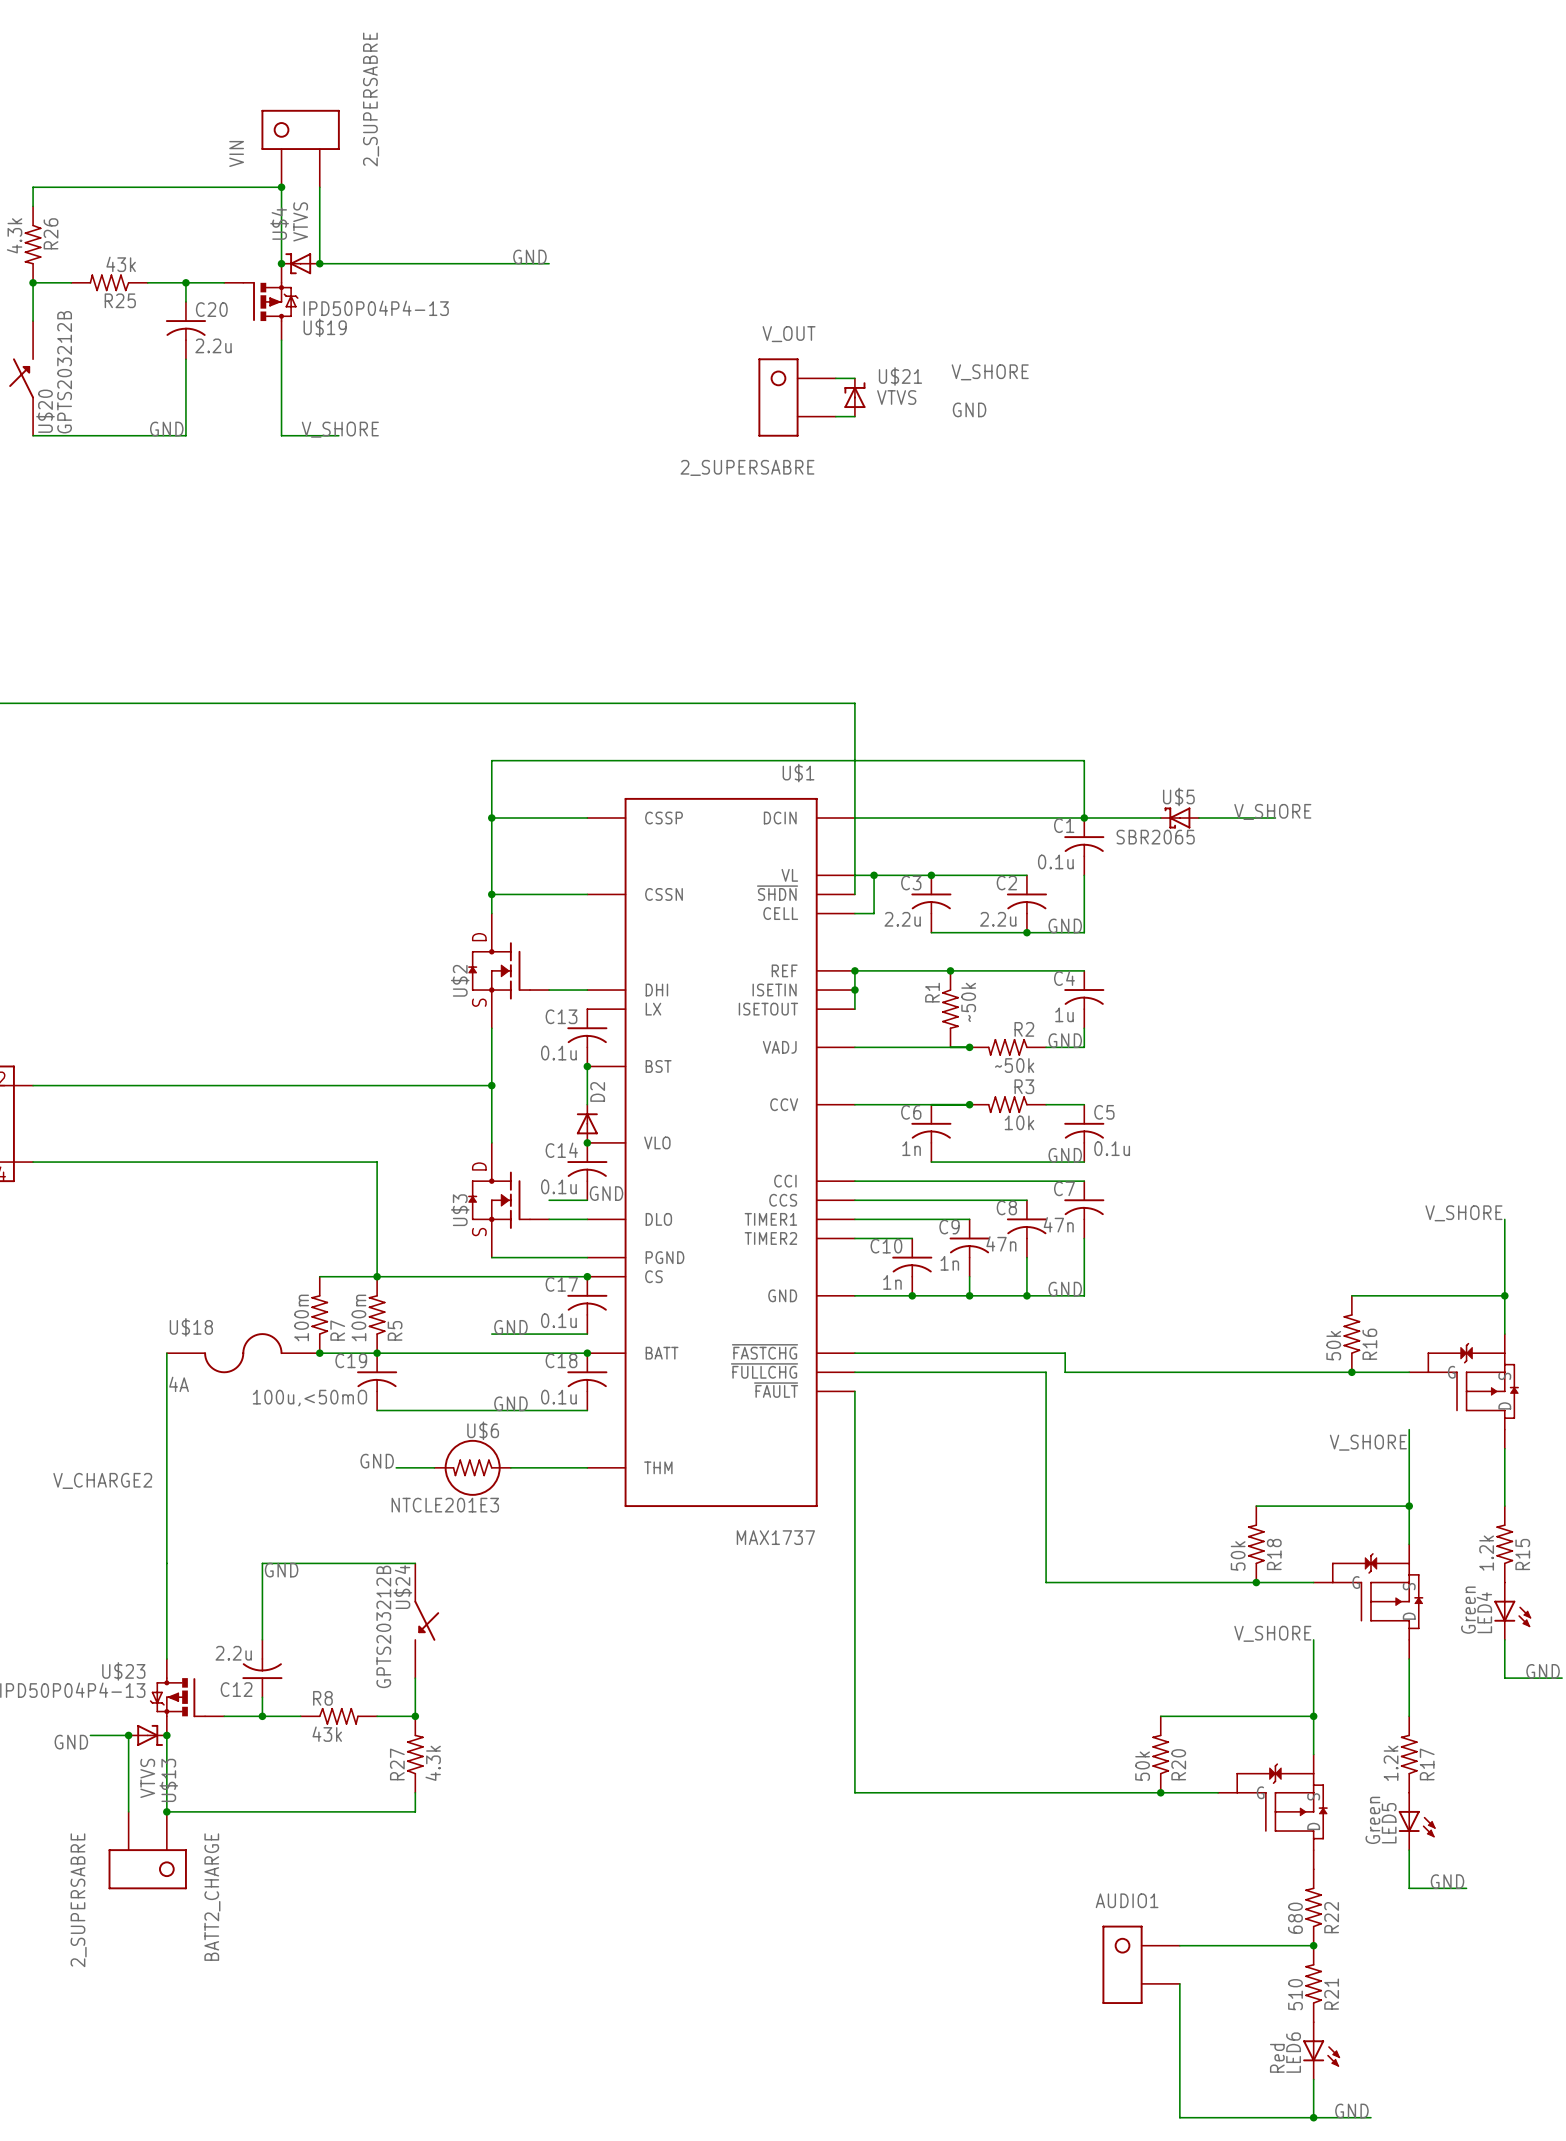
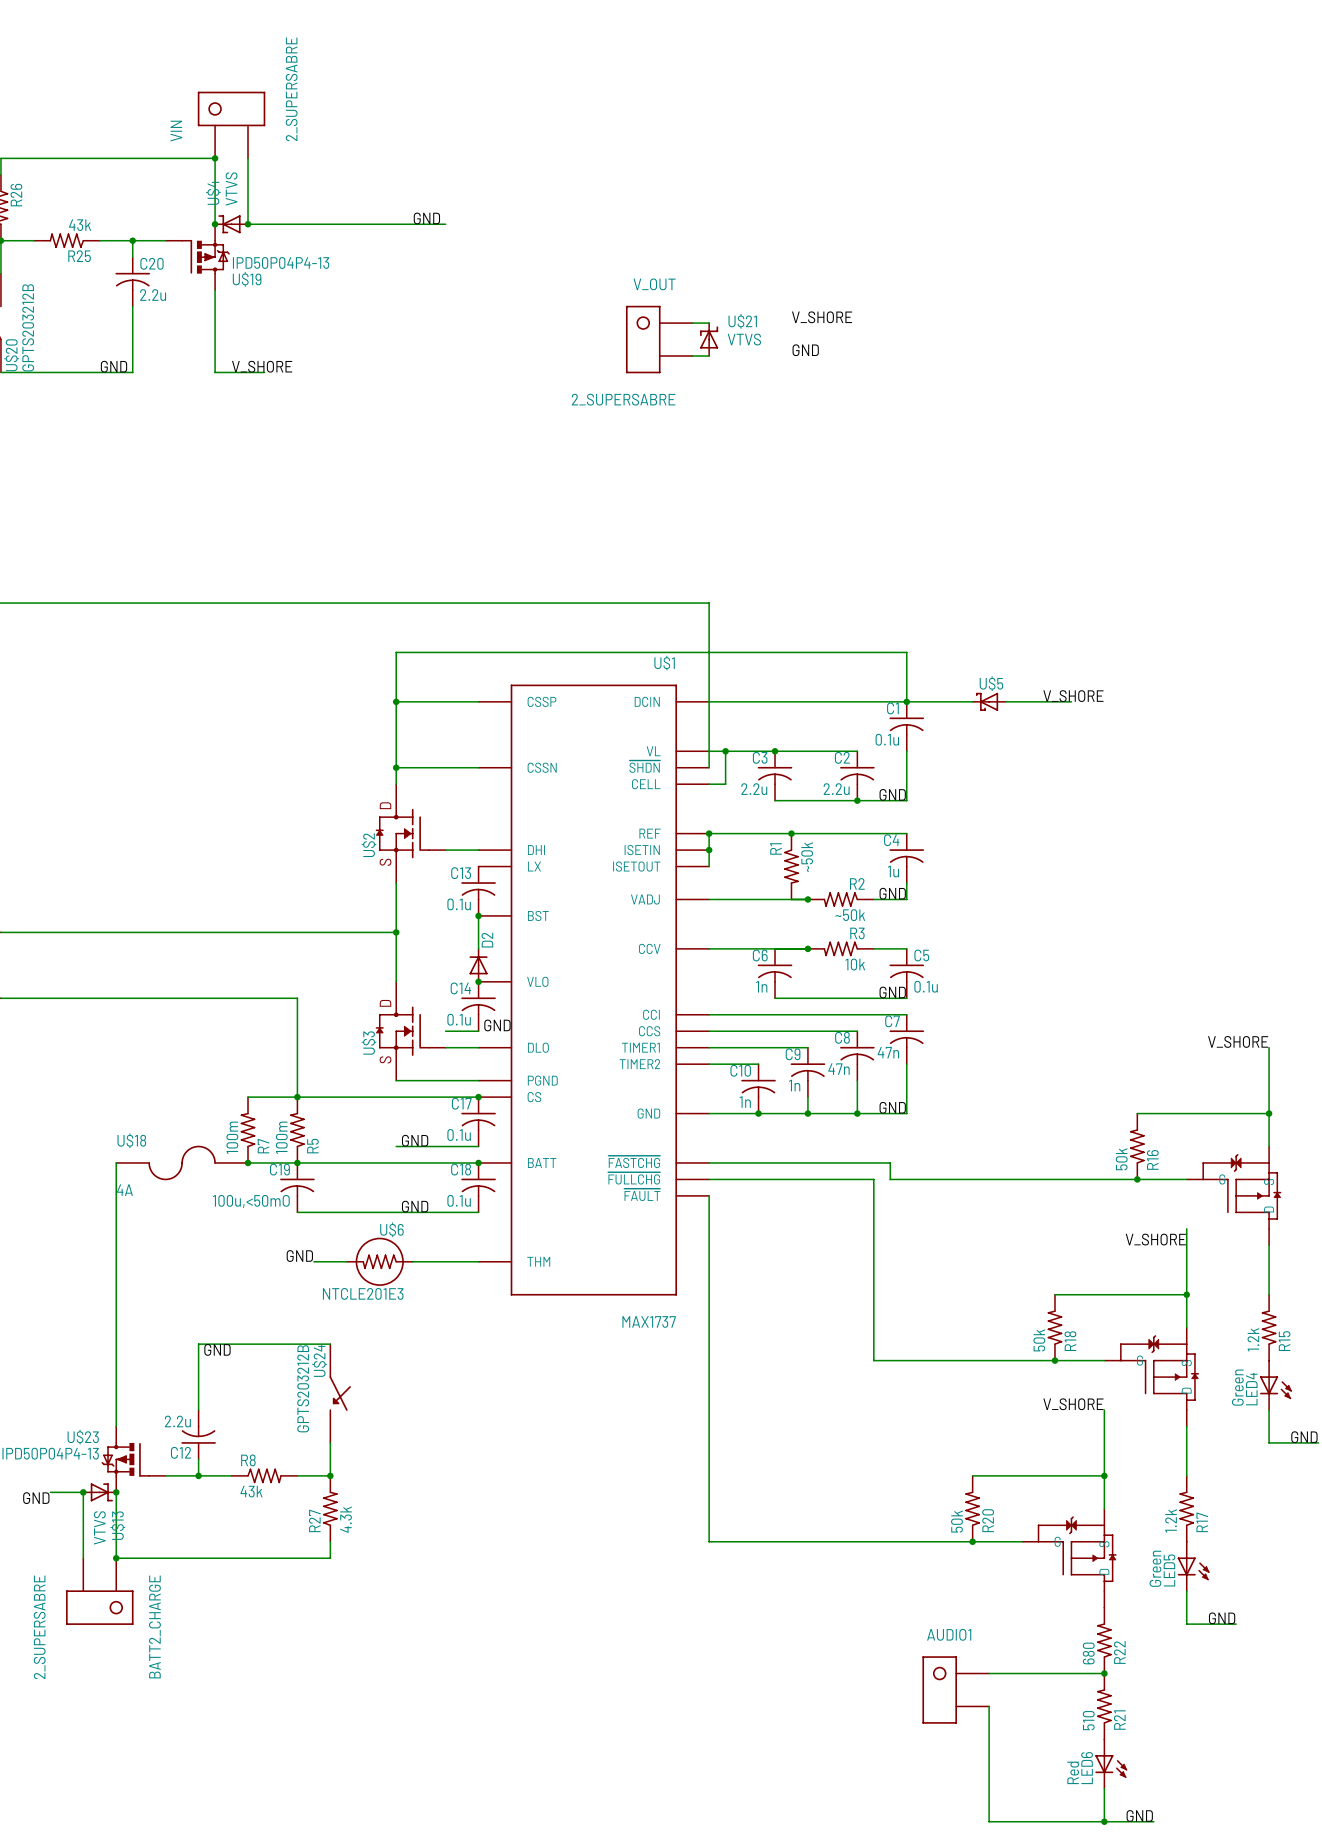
U$5 value: SBR2065 (1155, 837) -> none
label: V_CHARGE2 (102, 1480) -> none

